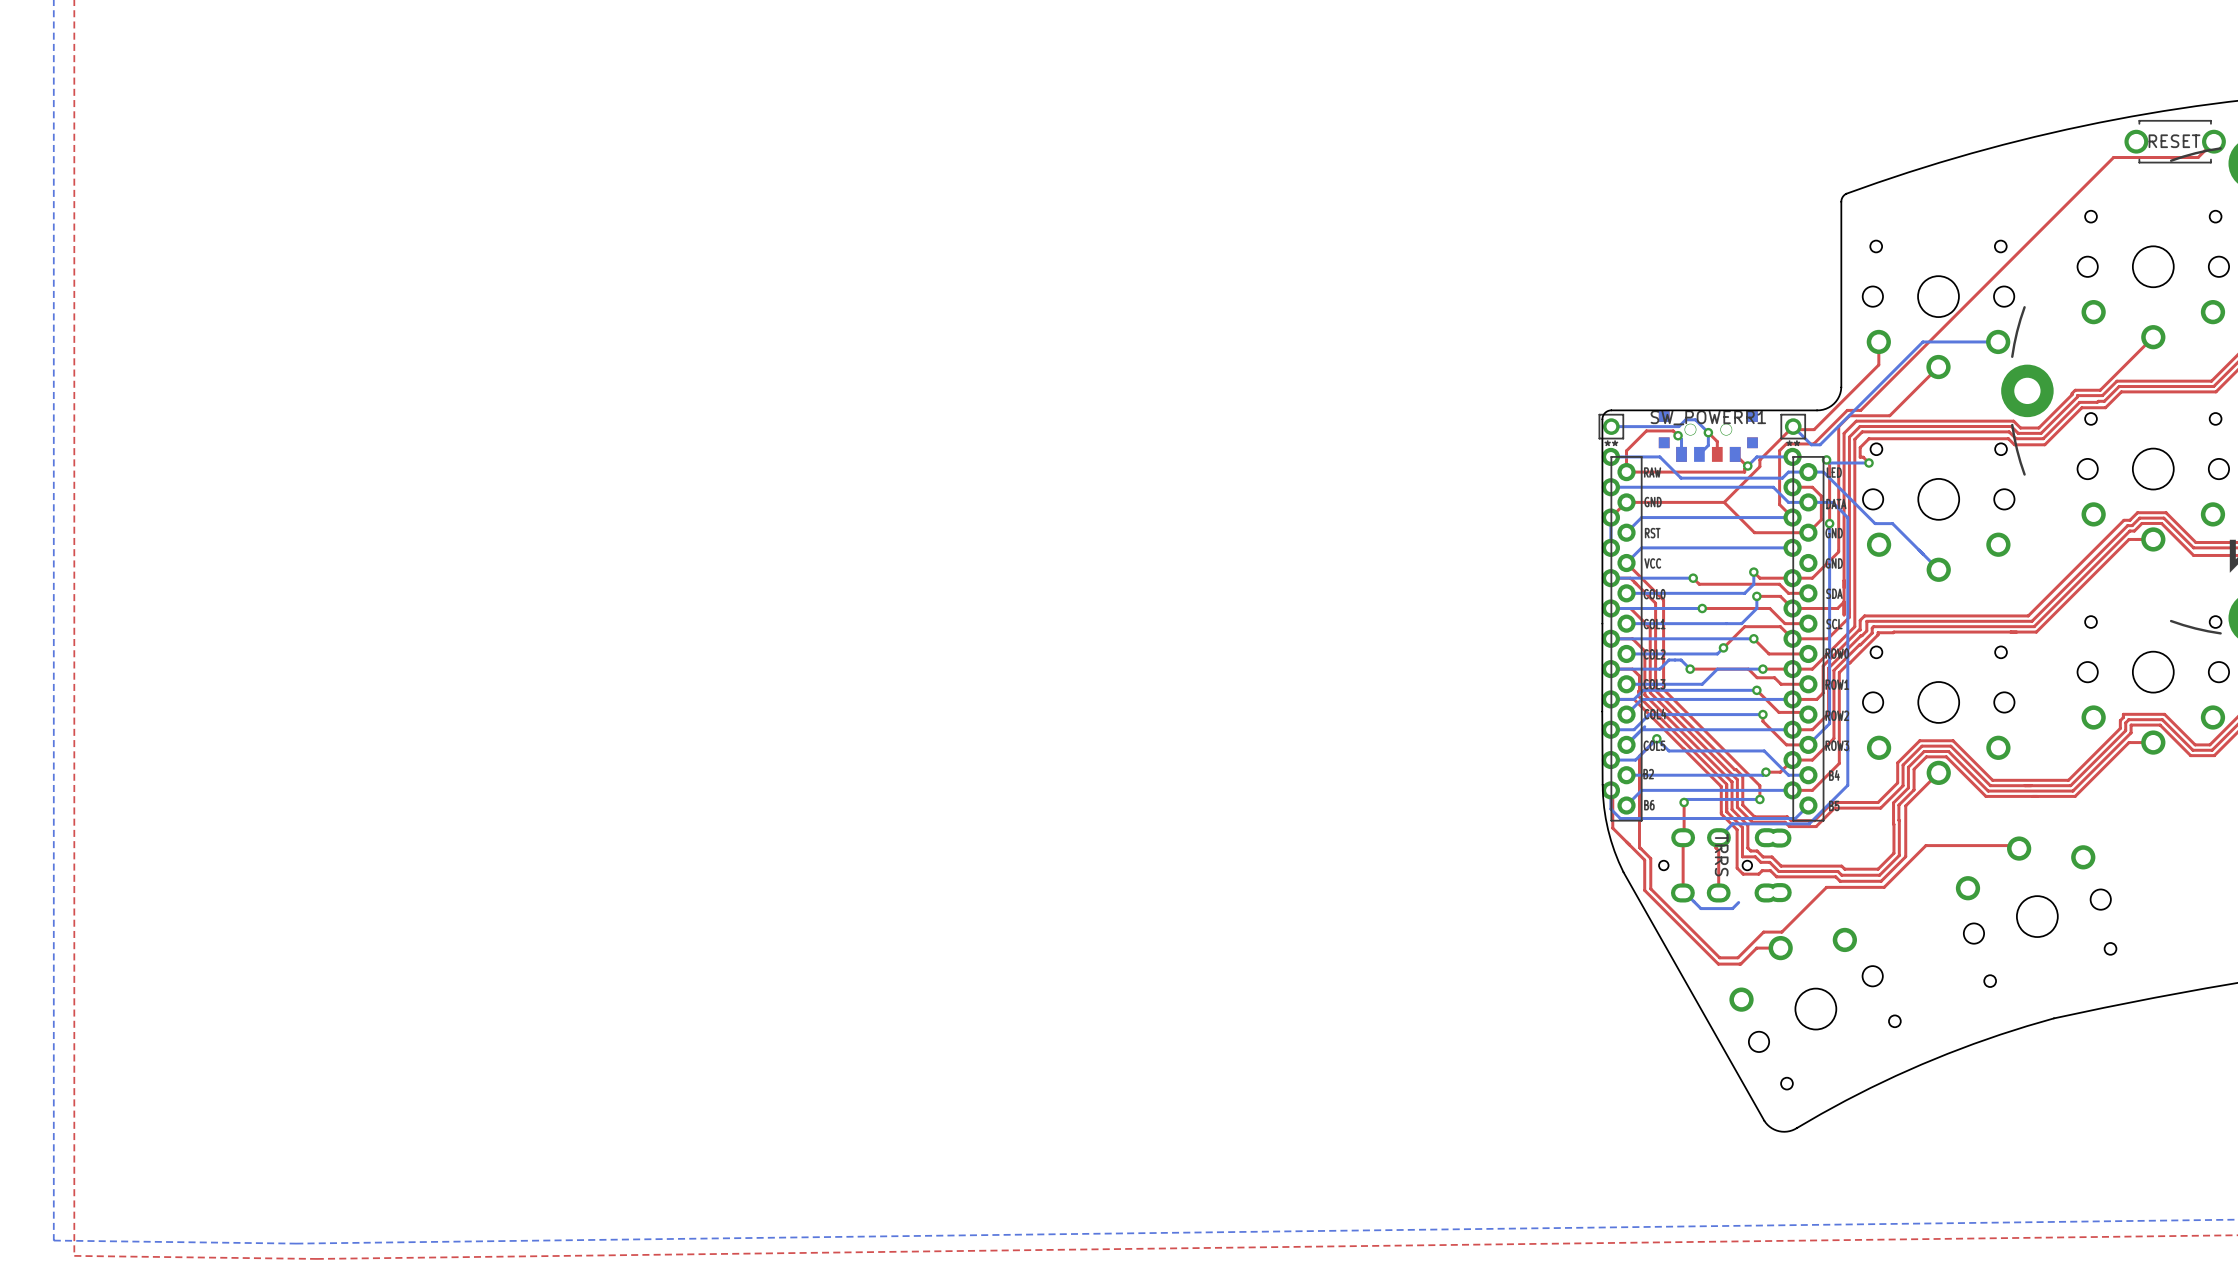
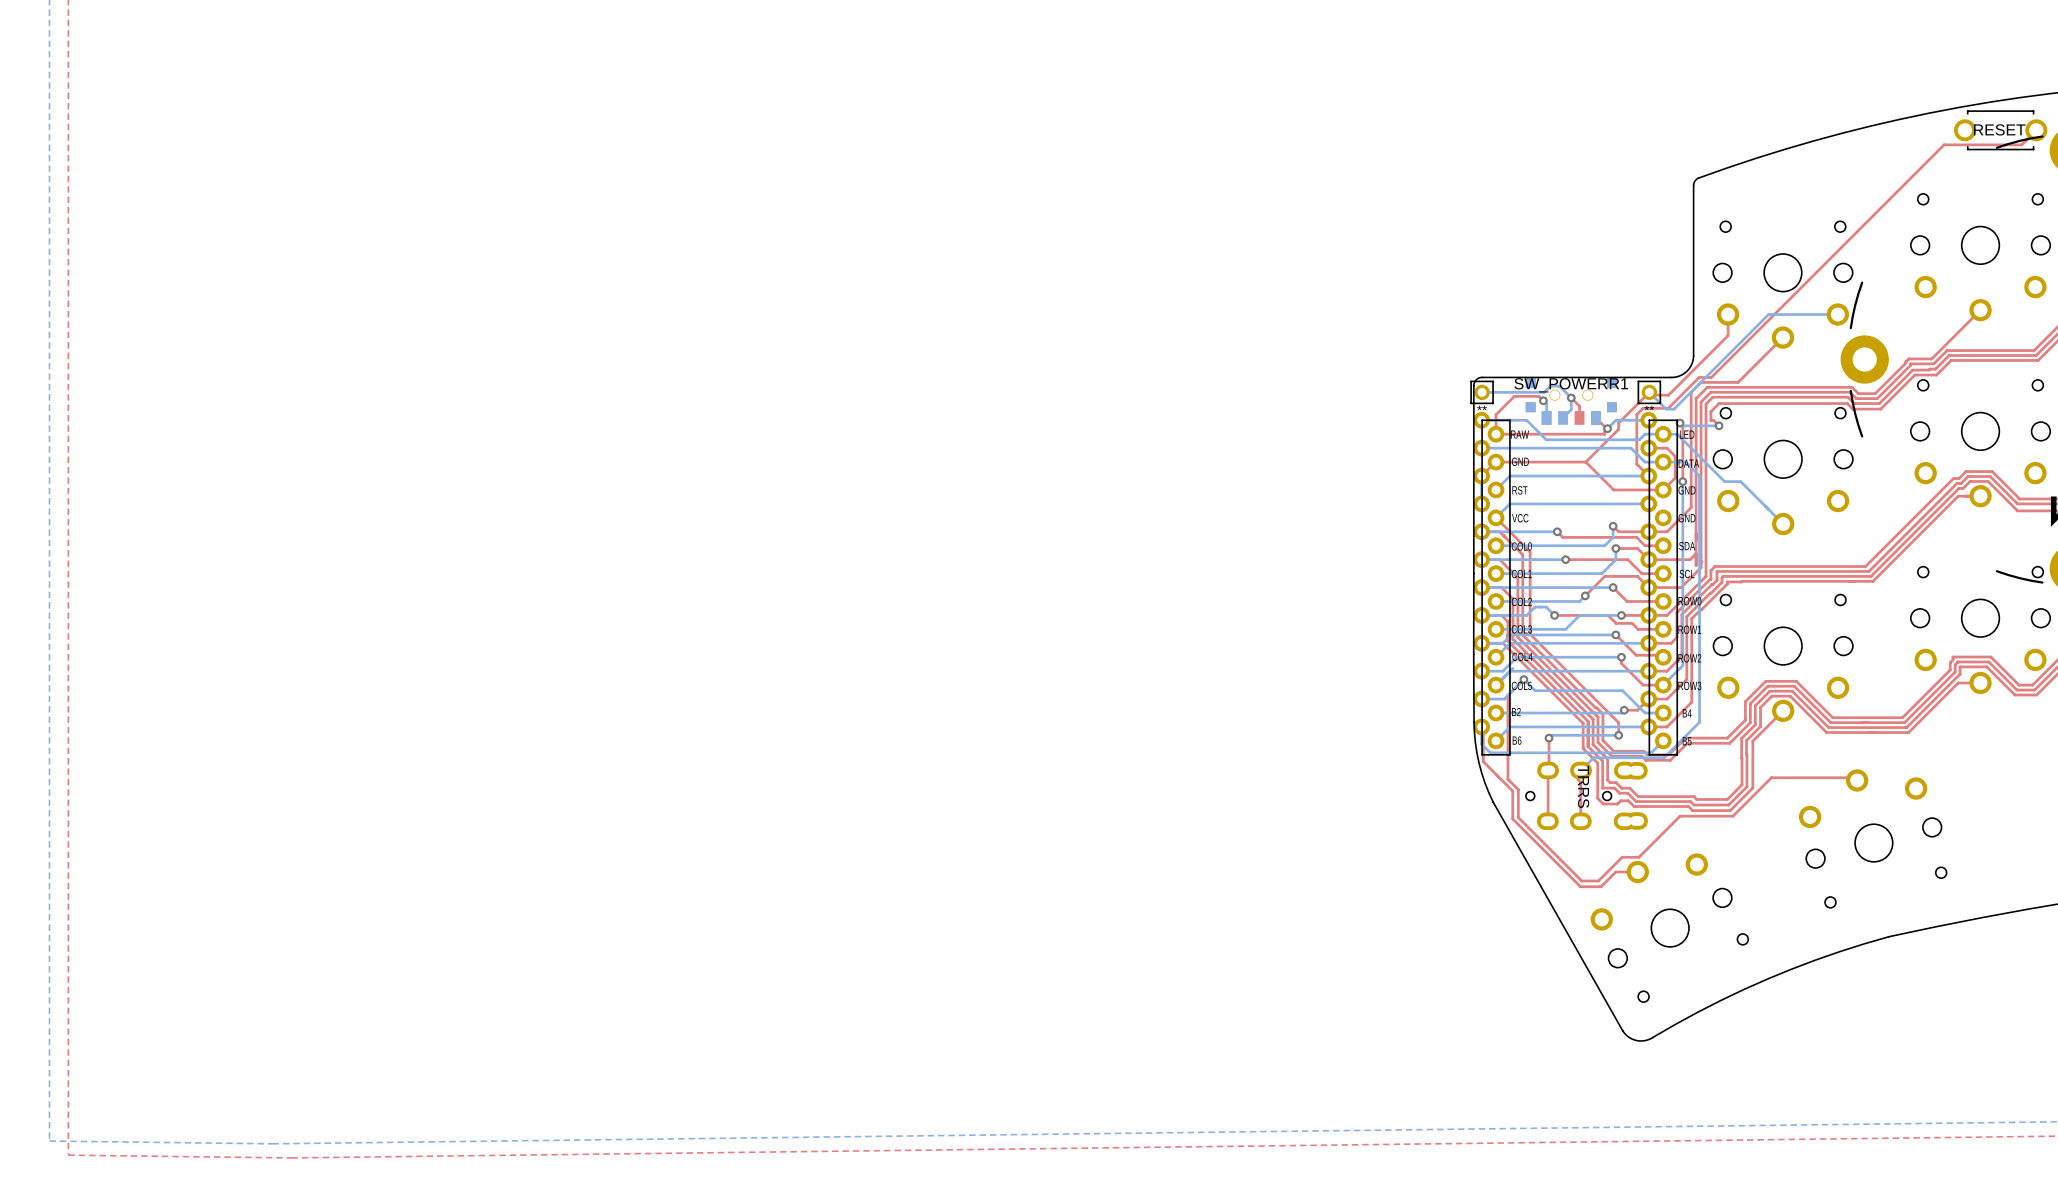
bottom track: (1682, 890) (1700, 908) (1732, 908) (1738, 902) -> none

